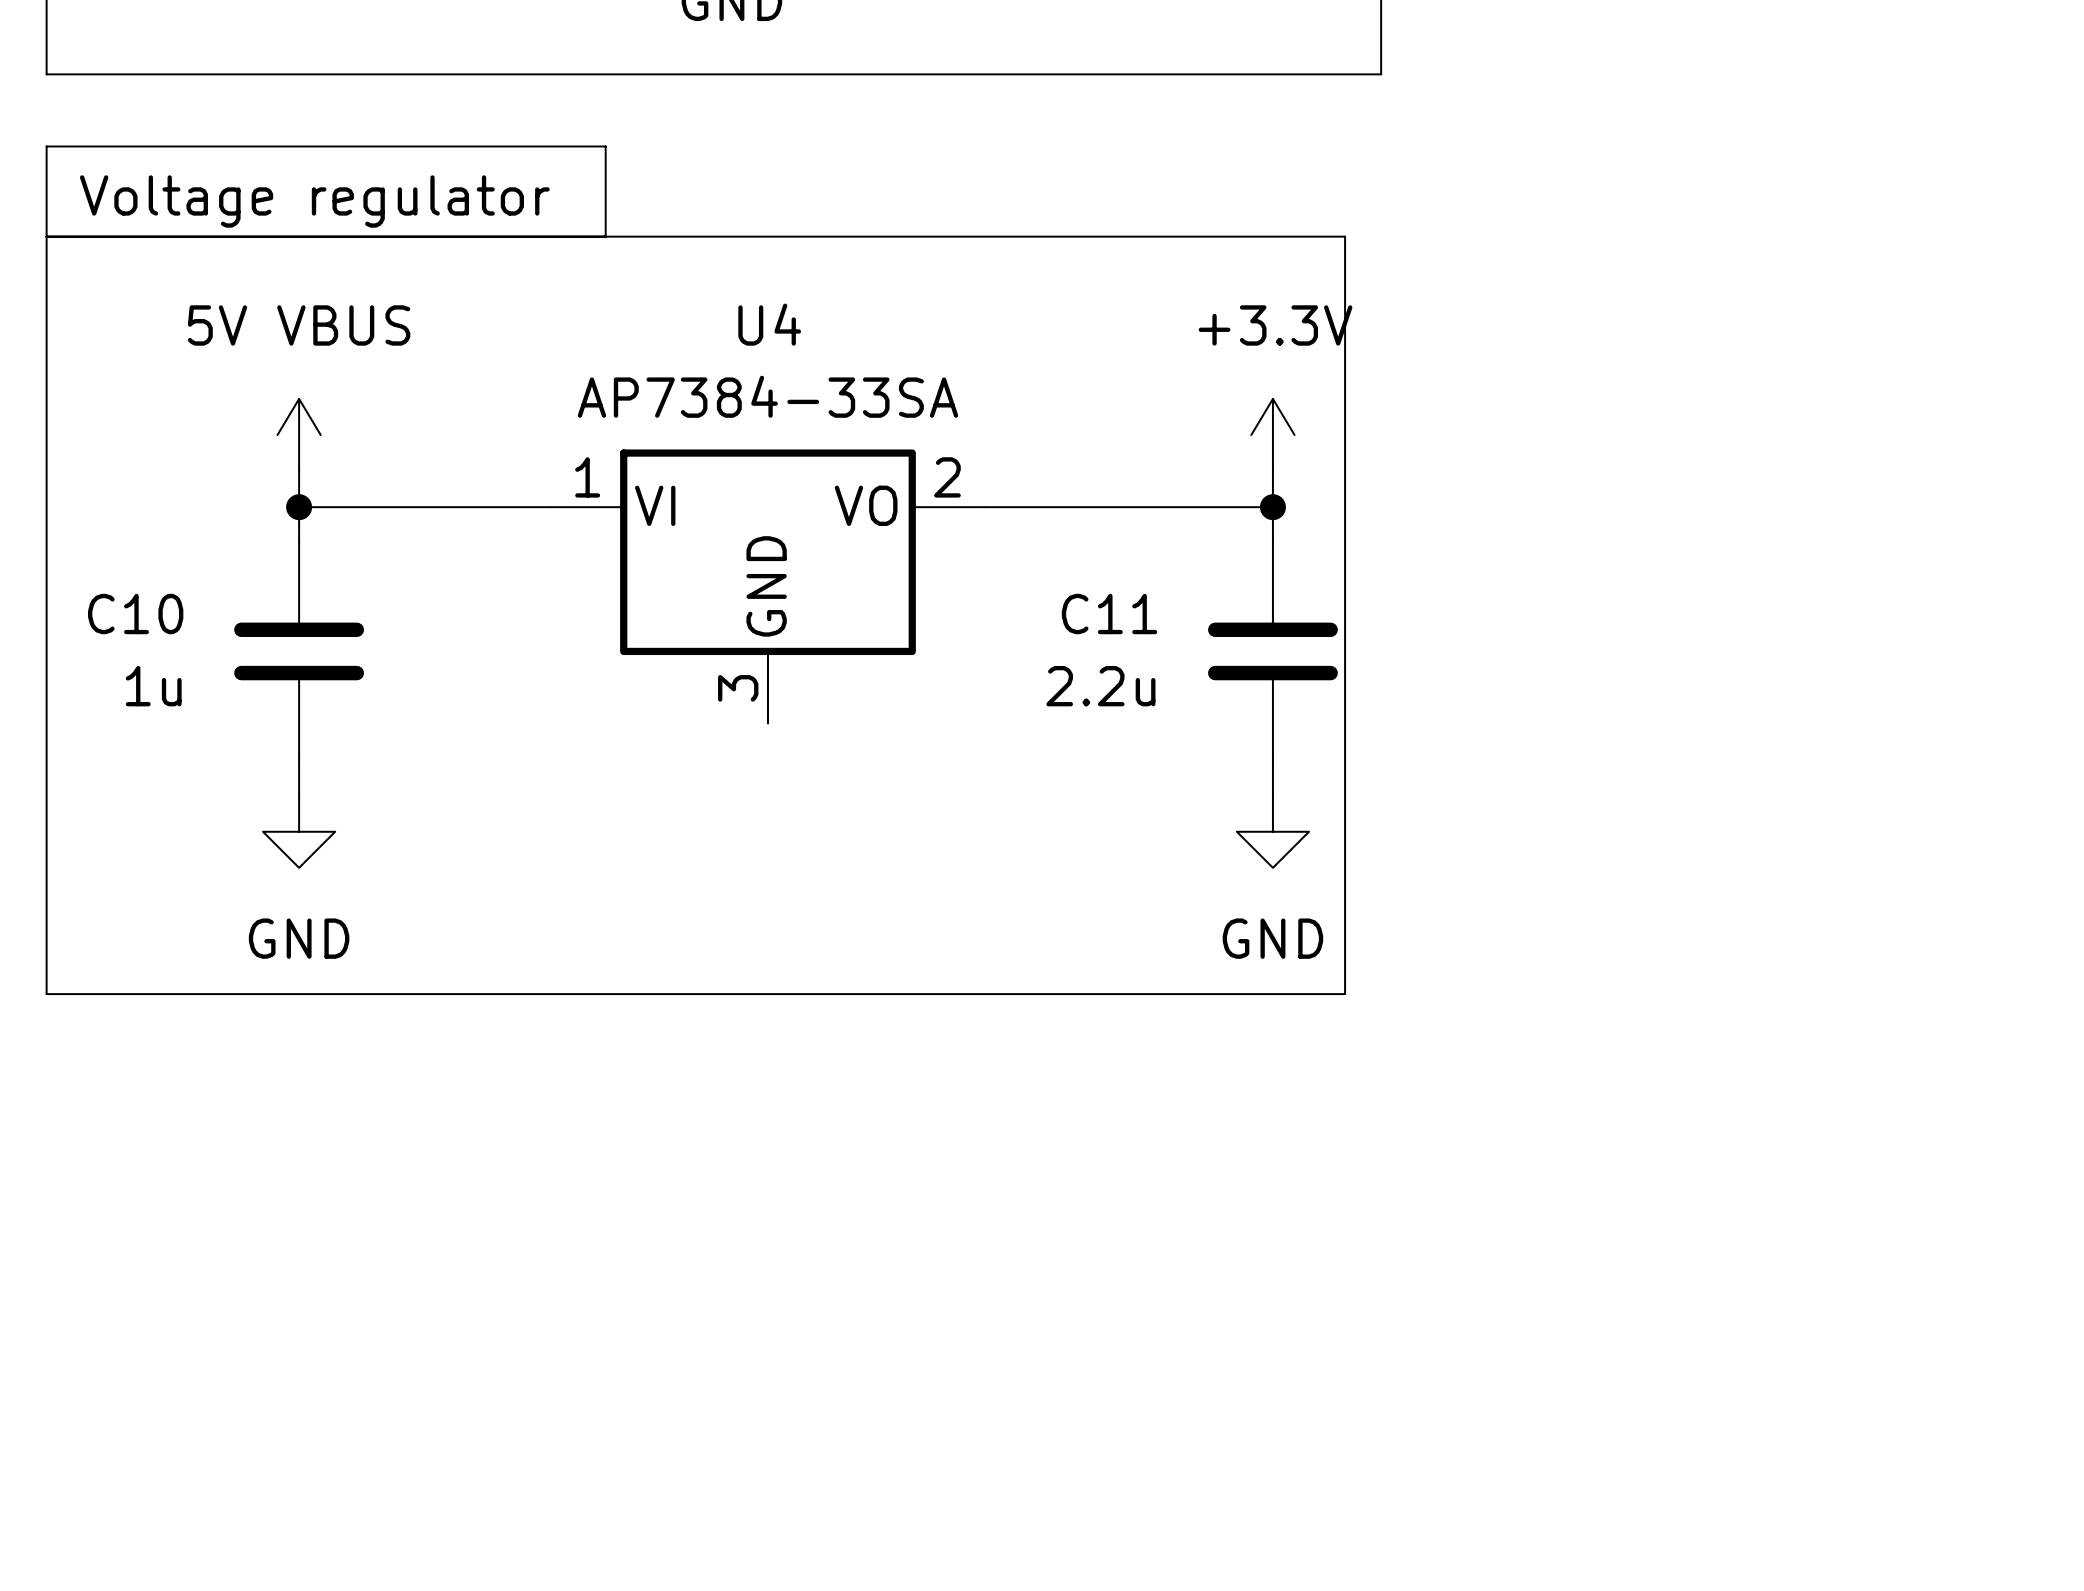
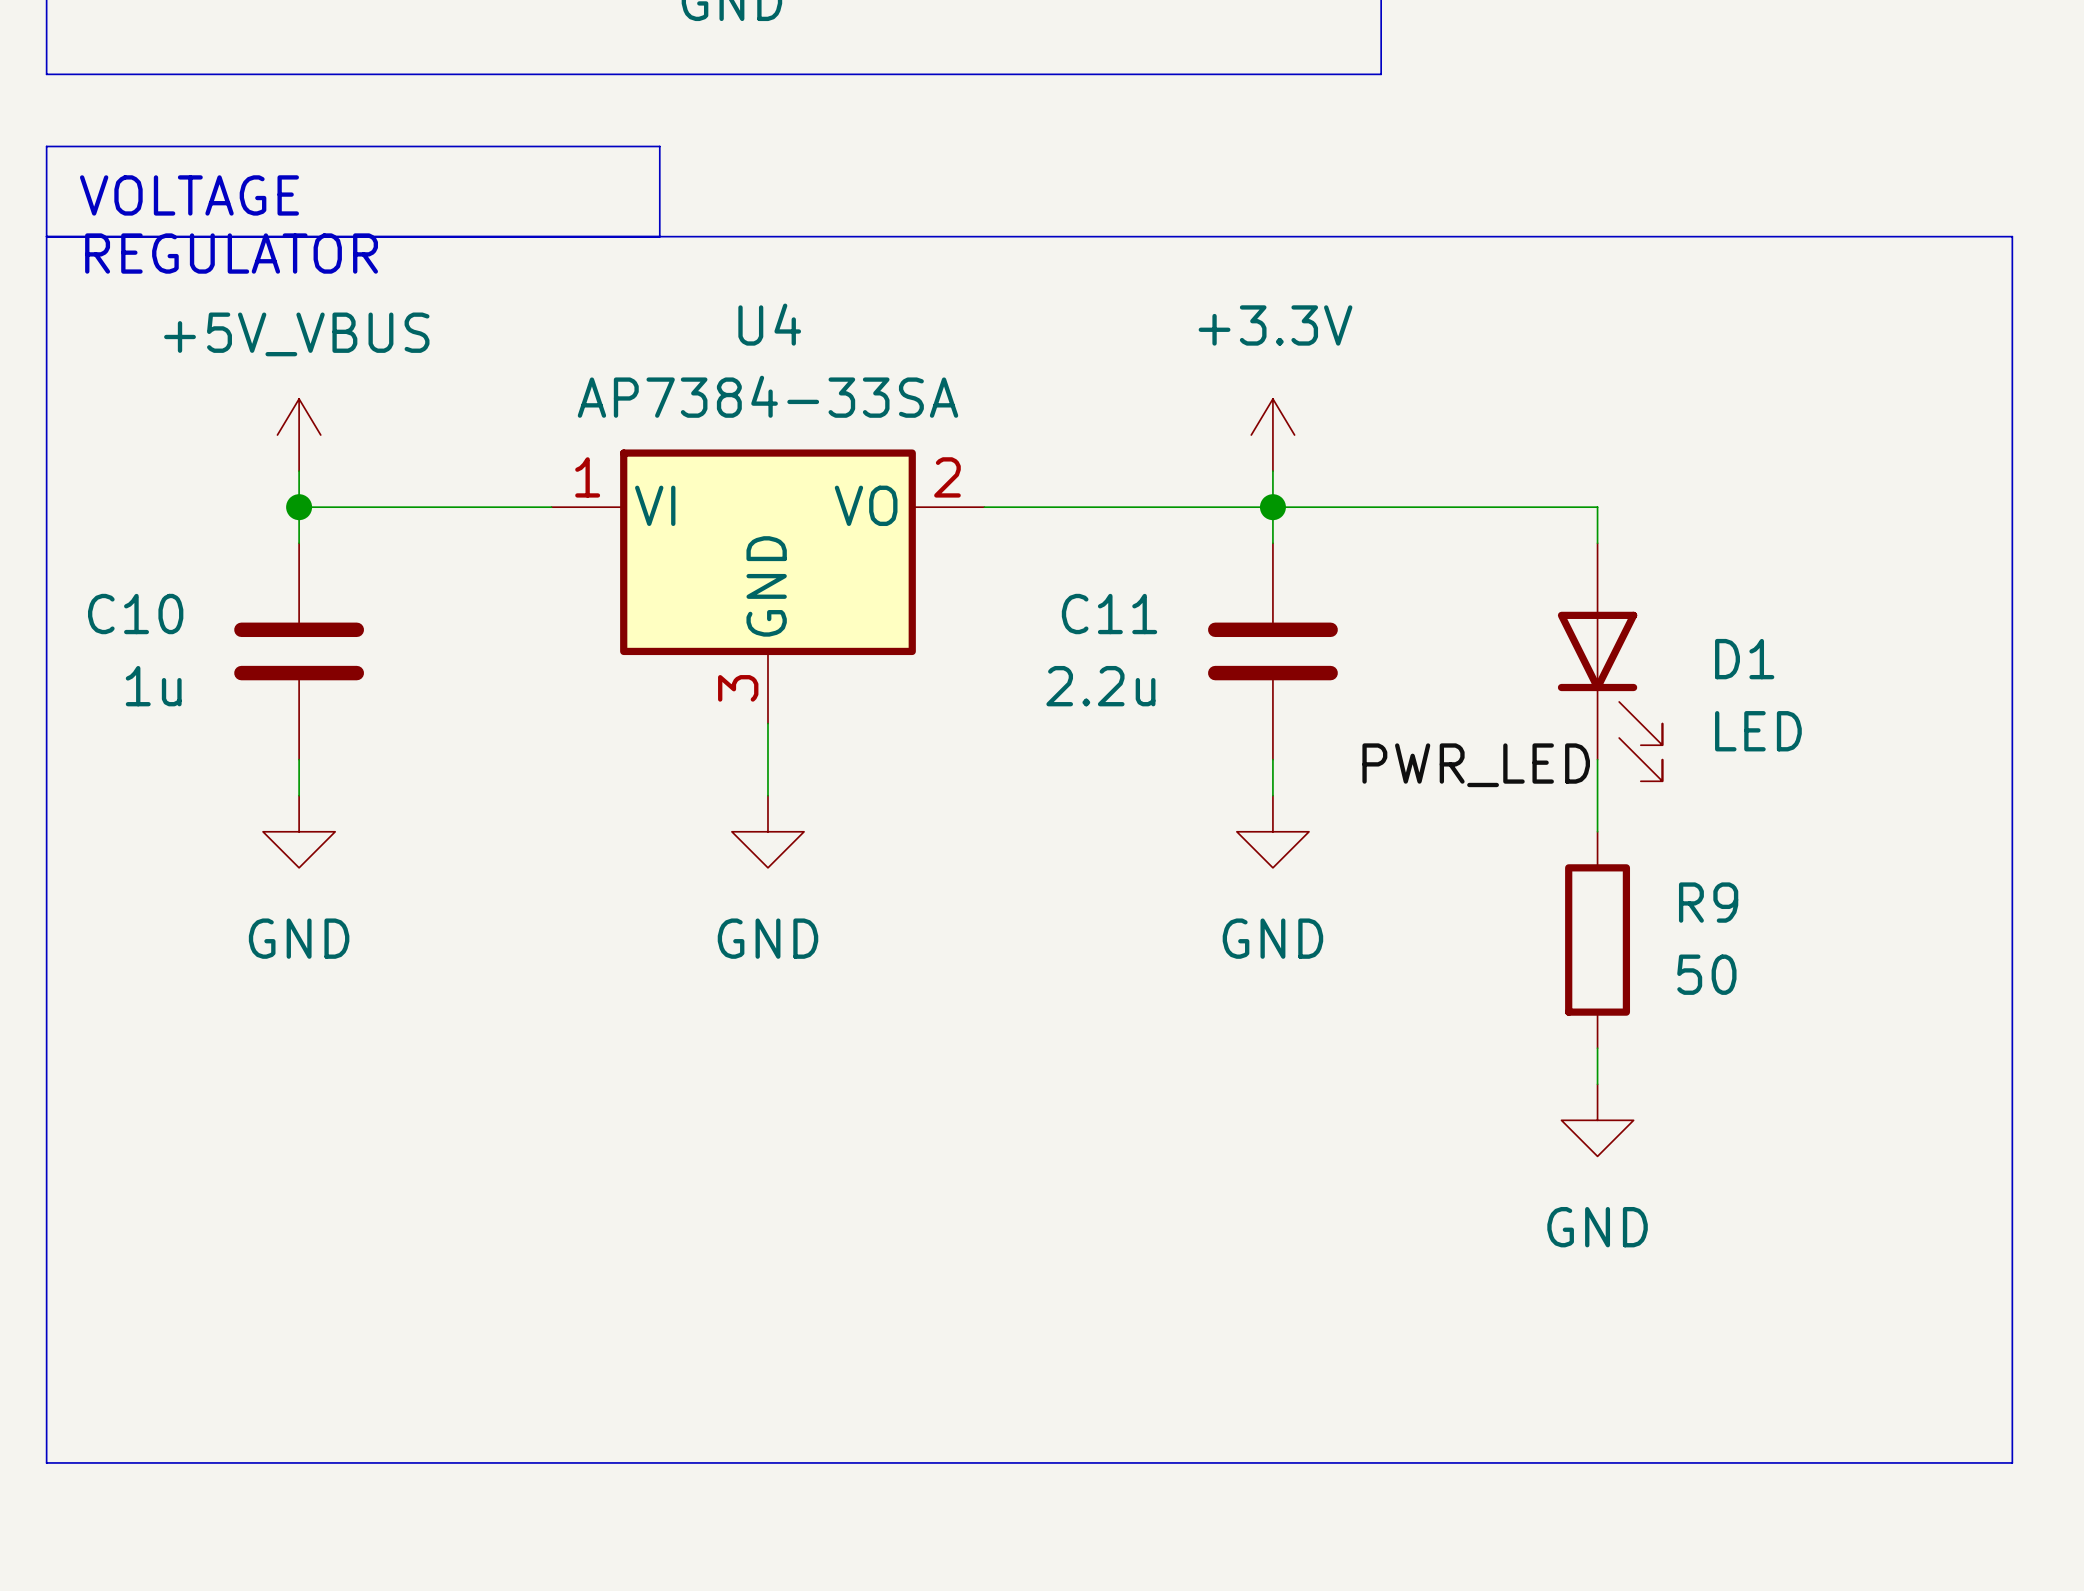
line: (605, 146) (605, 236) -> (605, 146) (659, 146) (659, 236) (605, 236)
text: Voltage regulator (314, 201) -> VOLTAGE (189, 195)
line: (1345, 236) (1345, 994) (46, 994) -> (1345, 236) (2012, 236) (2012, 1462) (46, 1462) (46, 994)
text: none -> REGULATOR (231, 253)
power symbol: 5V VBUS (299, 435) -> +5V_VBUS (299, 435)
wire: none -> (1272, 507) (1597, 507) (1597, 543)
D1: none -> LED (1610, 662)
wire: none -> (767, 723) (767, 795)
wire: none -> (1597, 759) (1597, 831)
label: none -> PWR_LED (1476, 765)
power symbol: none -> GND (767, 831)
R9: none -> 50 (1597, 939)
wire: none -> (1597, 1048) (1597, 1084)
power symbol: none -> GND (1597, 1120)

